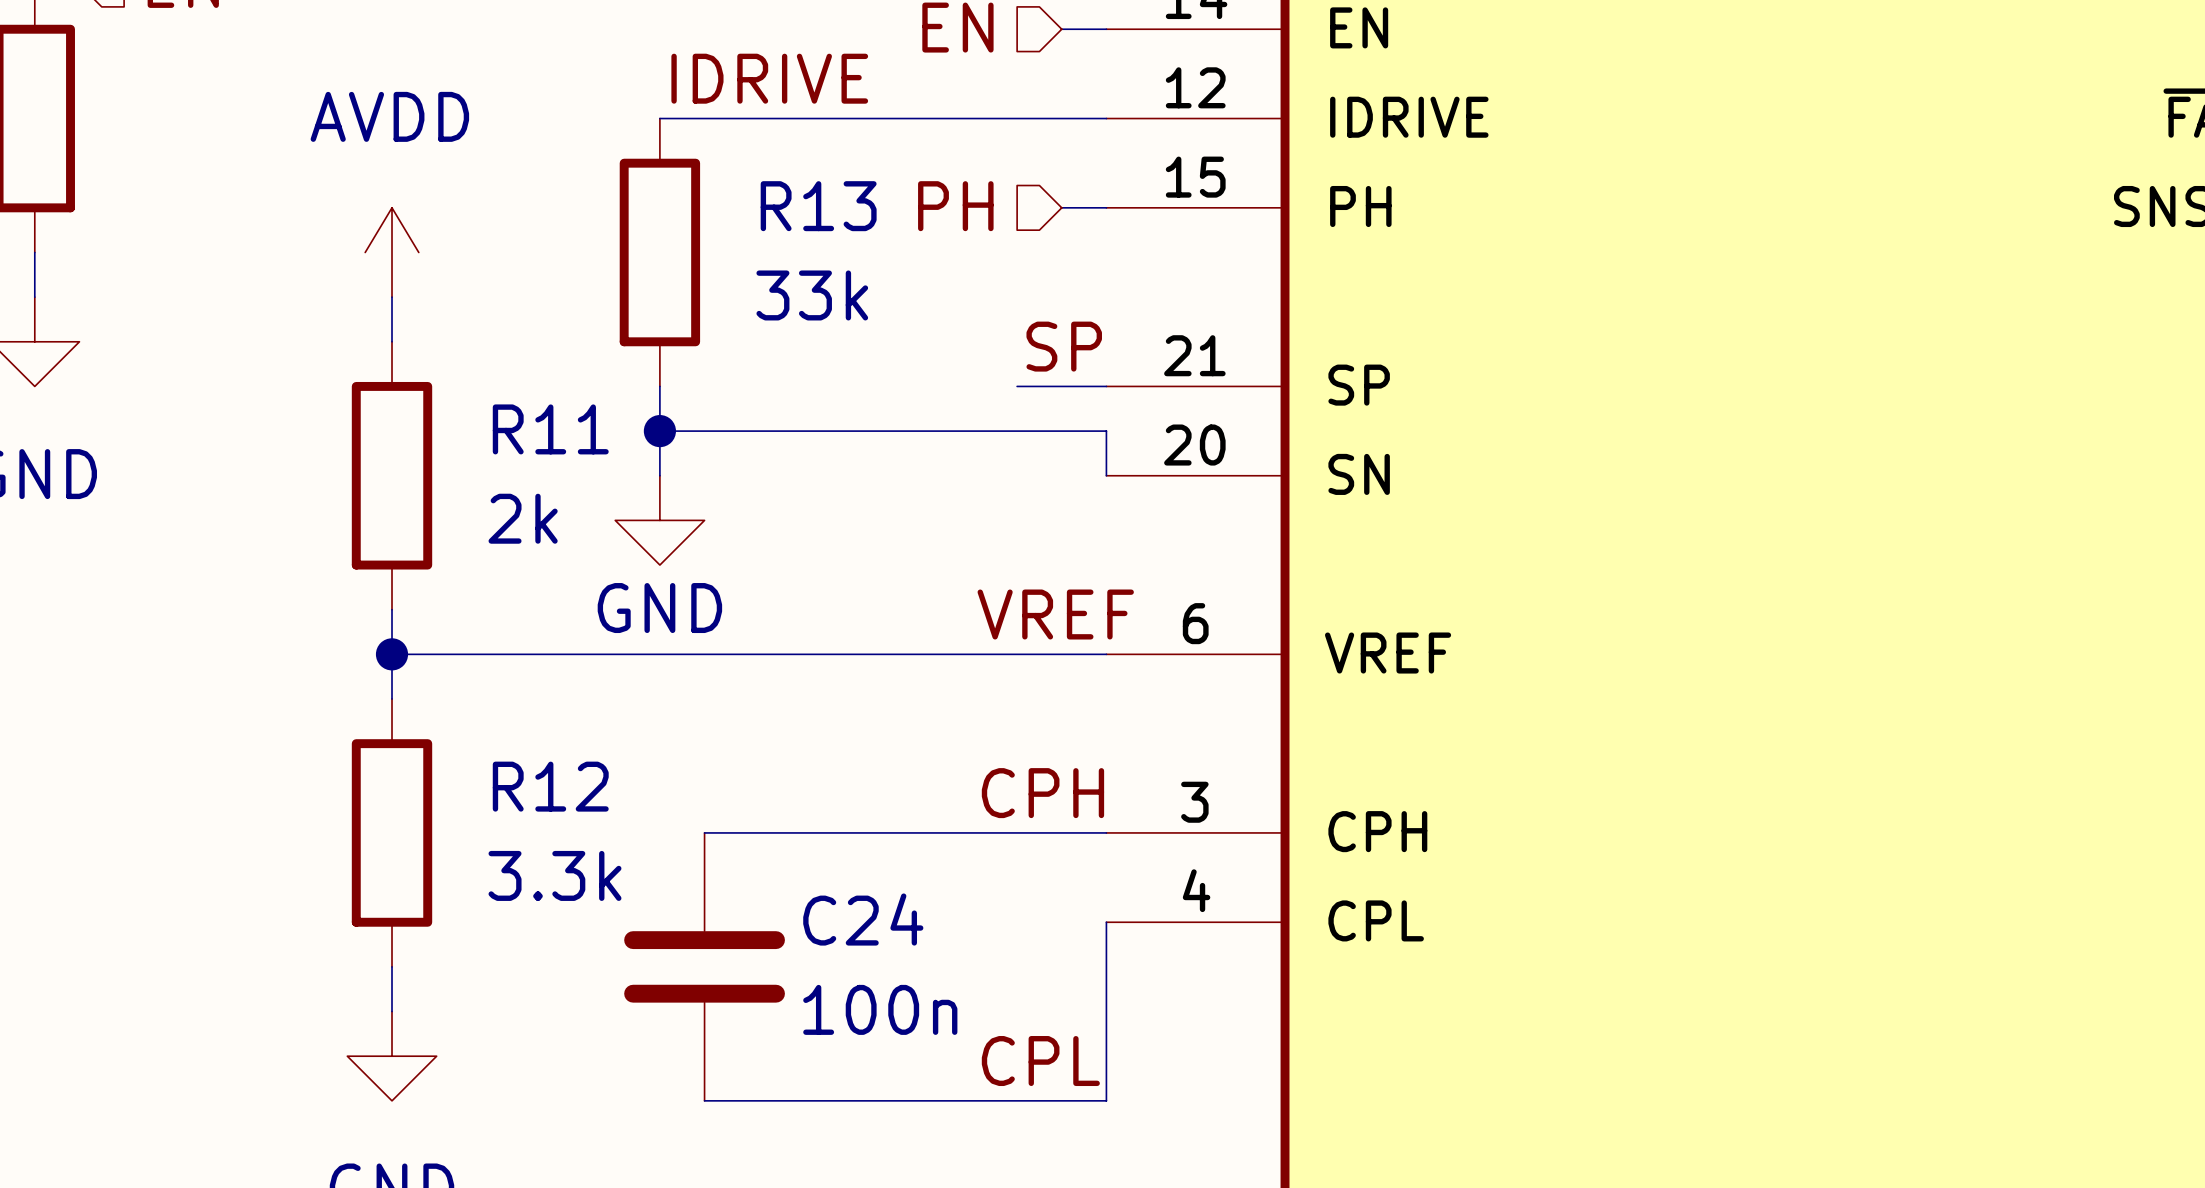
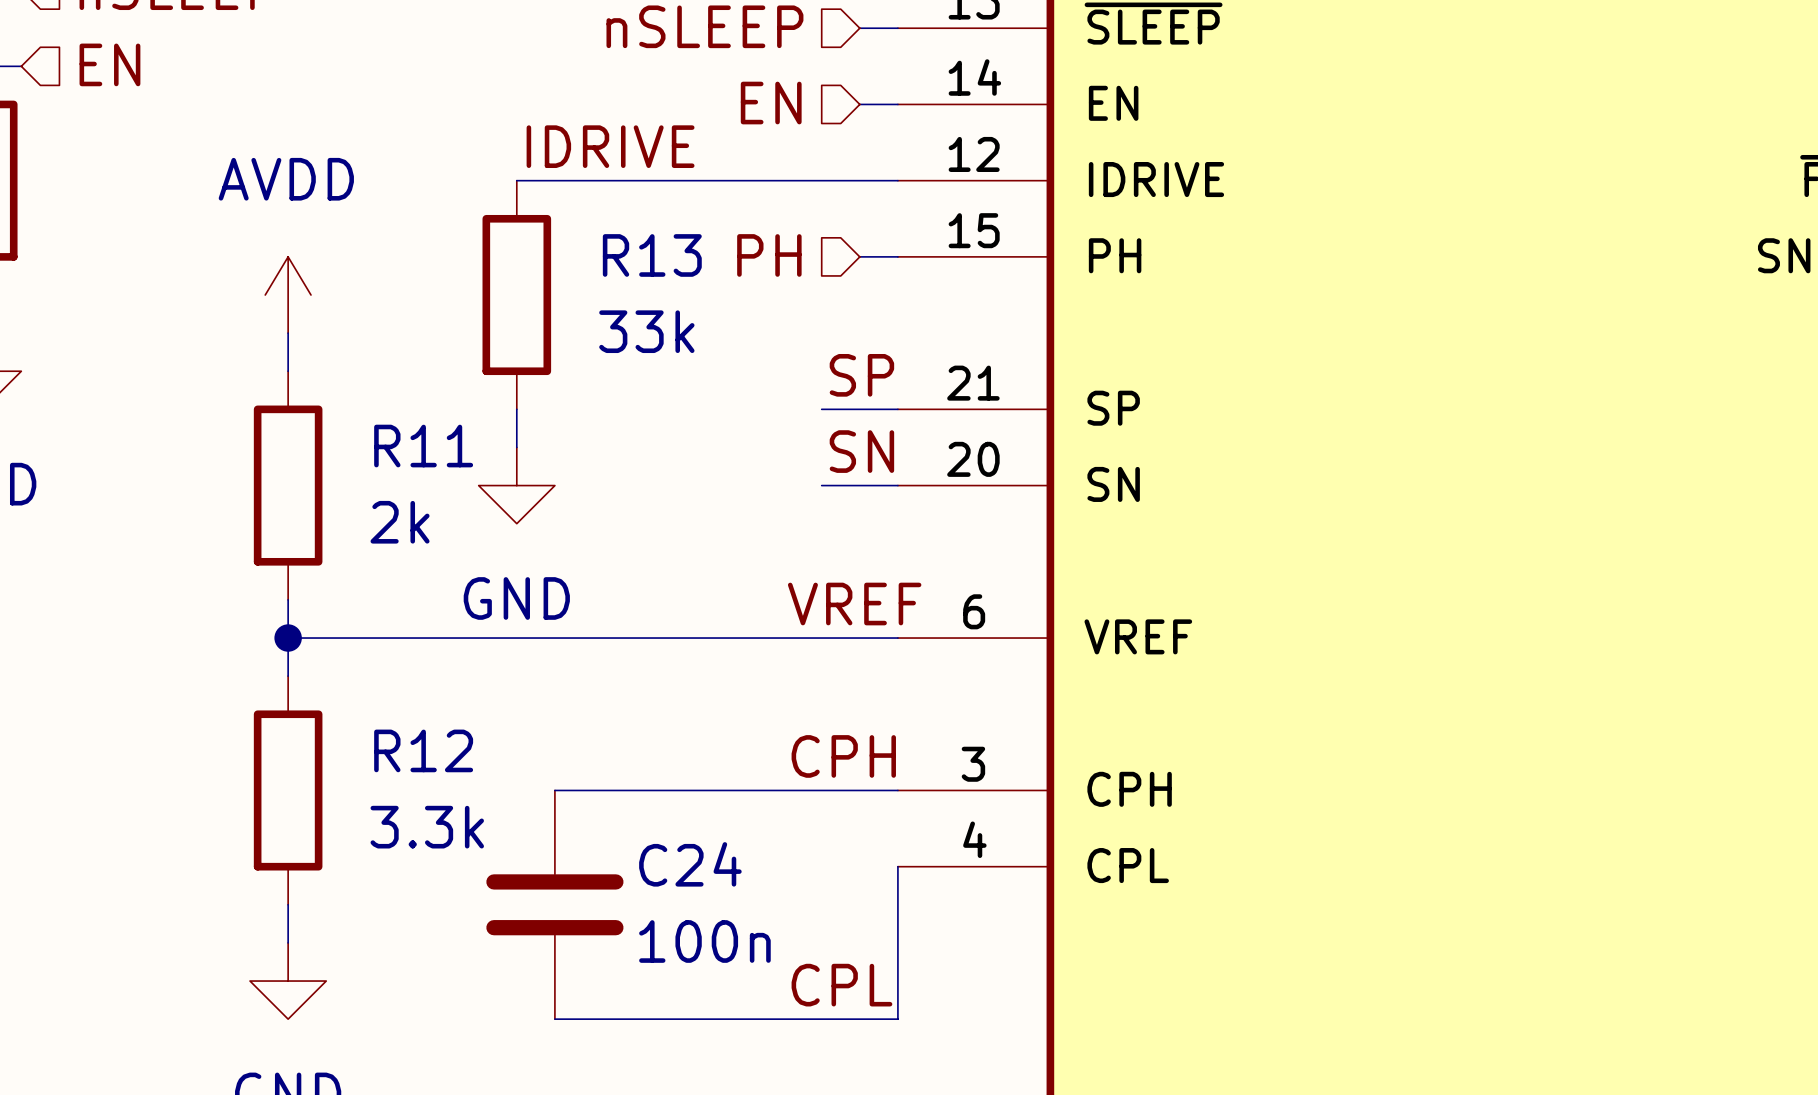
junction: (659, 431) -> none
label: none -> SN (861, 451)
wire: (659, 475) (659, 431) (1106, 431) (1106, 475) -> (821, 485) (897, 485)
power symbol position: GND (659, 520) -> GND (516, 485)

